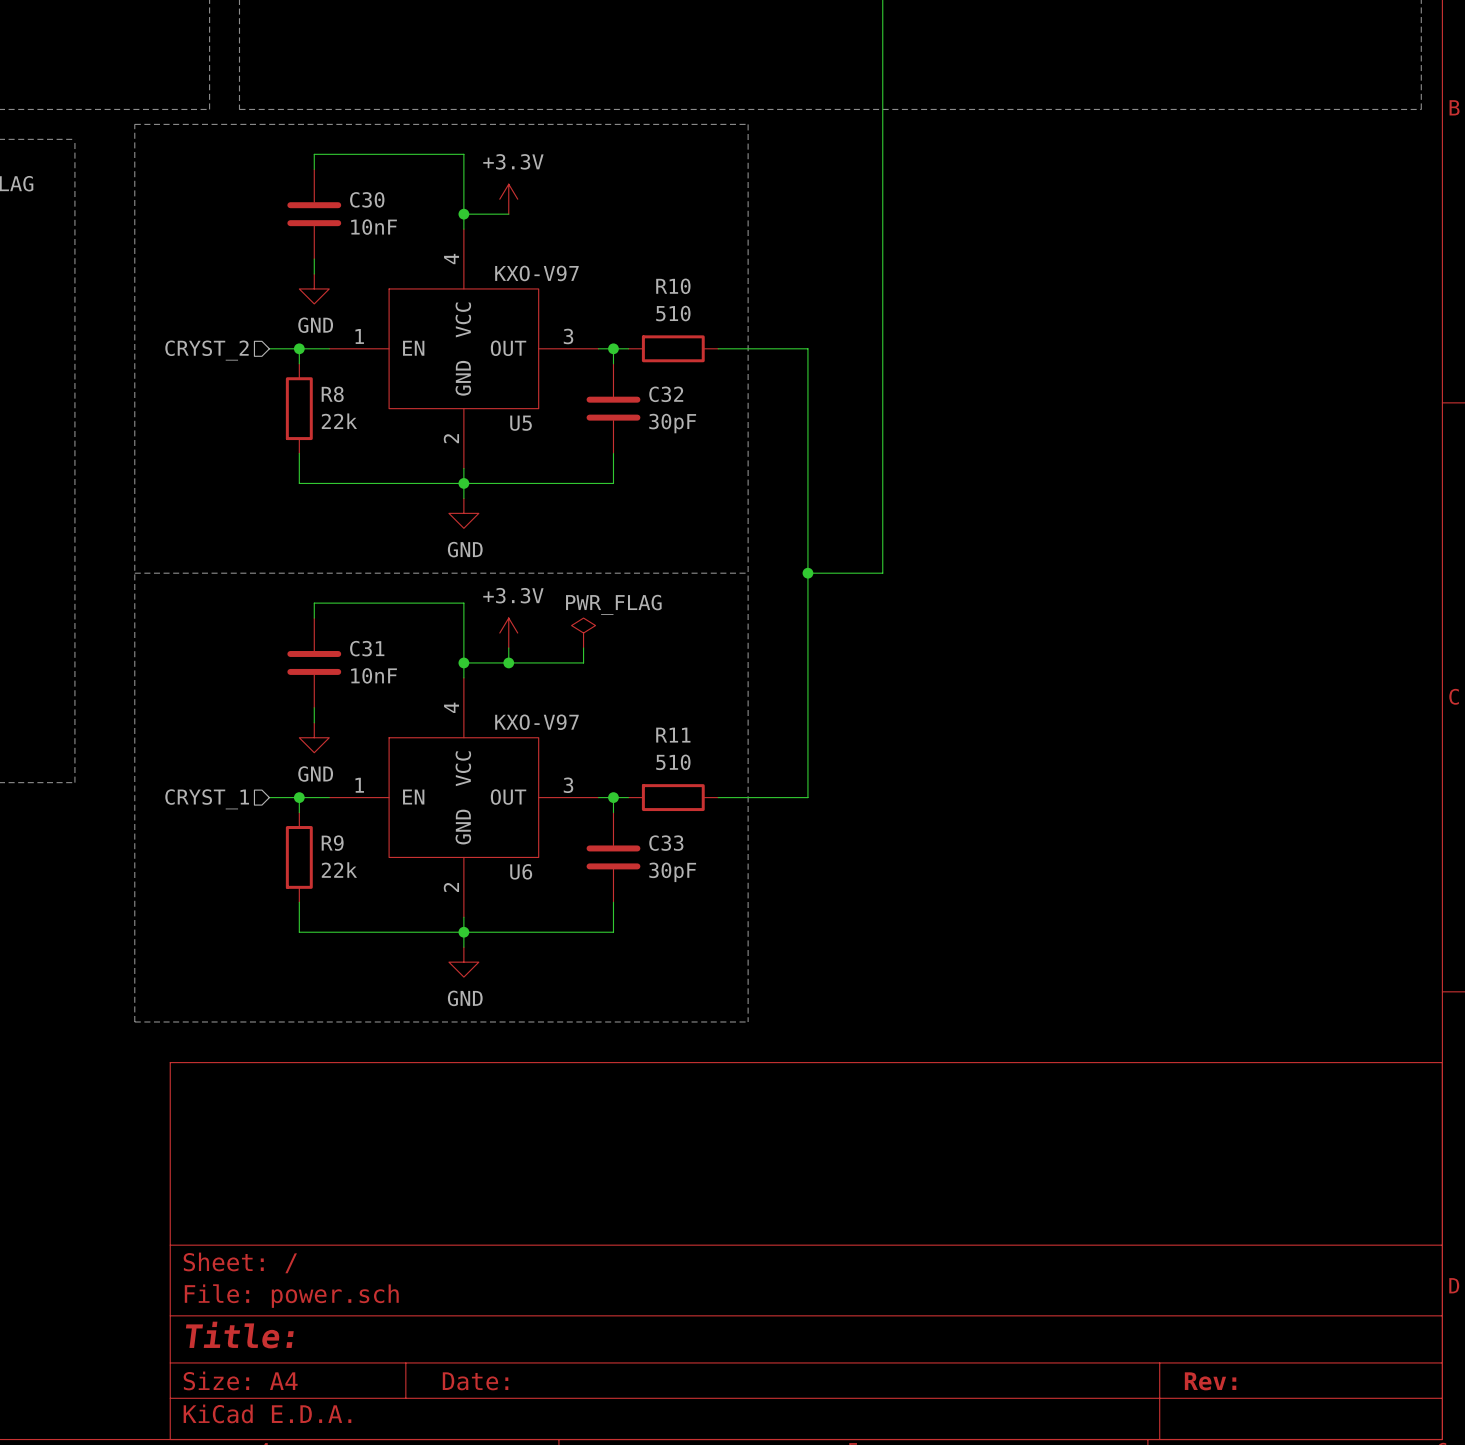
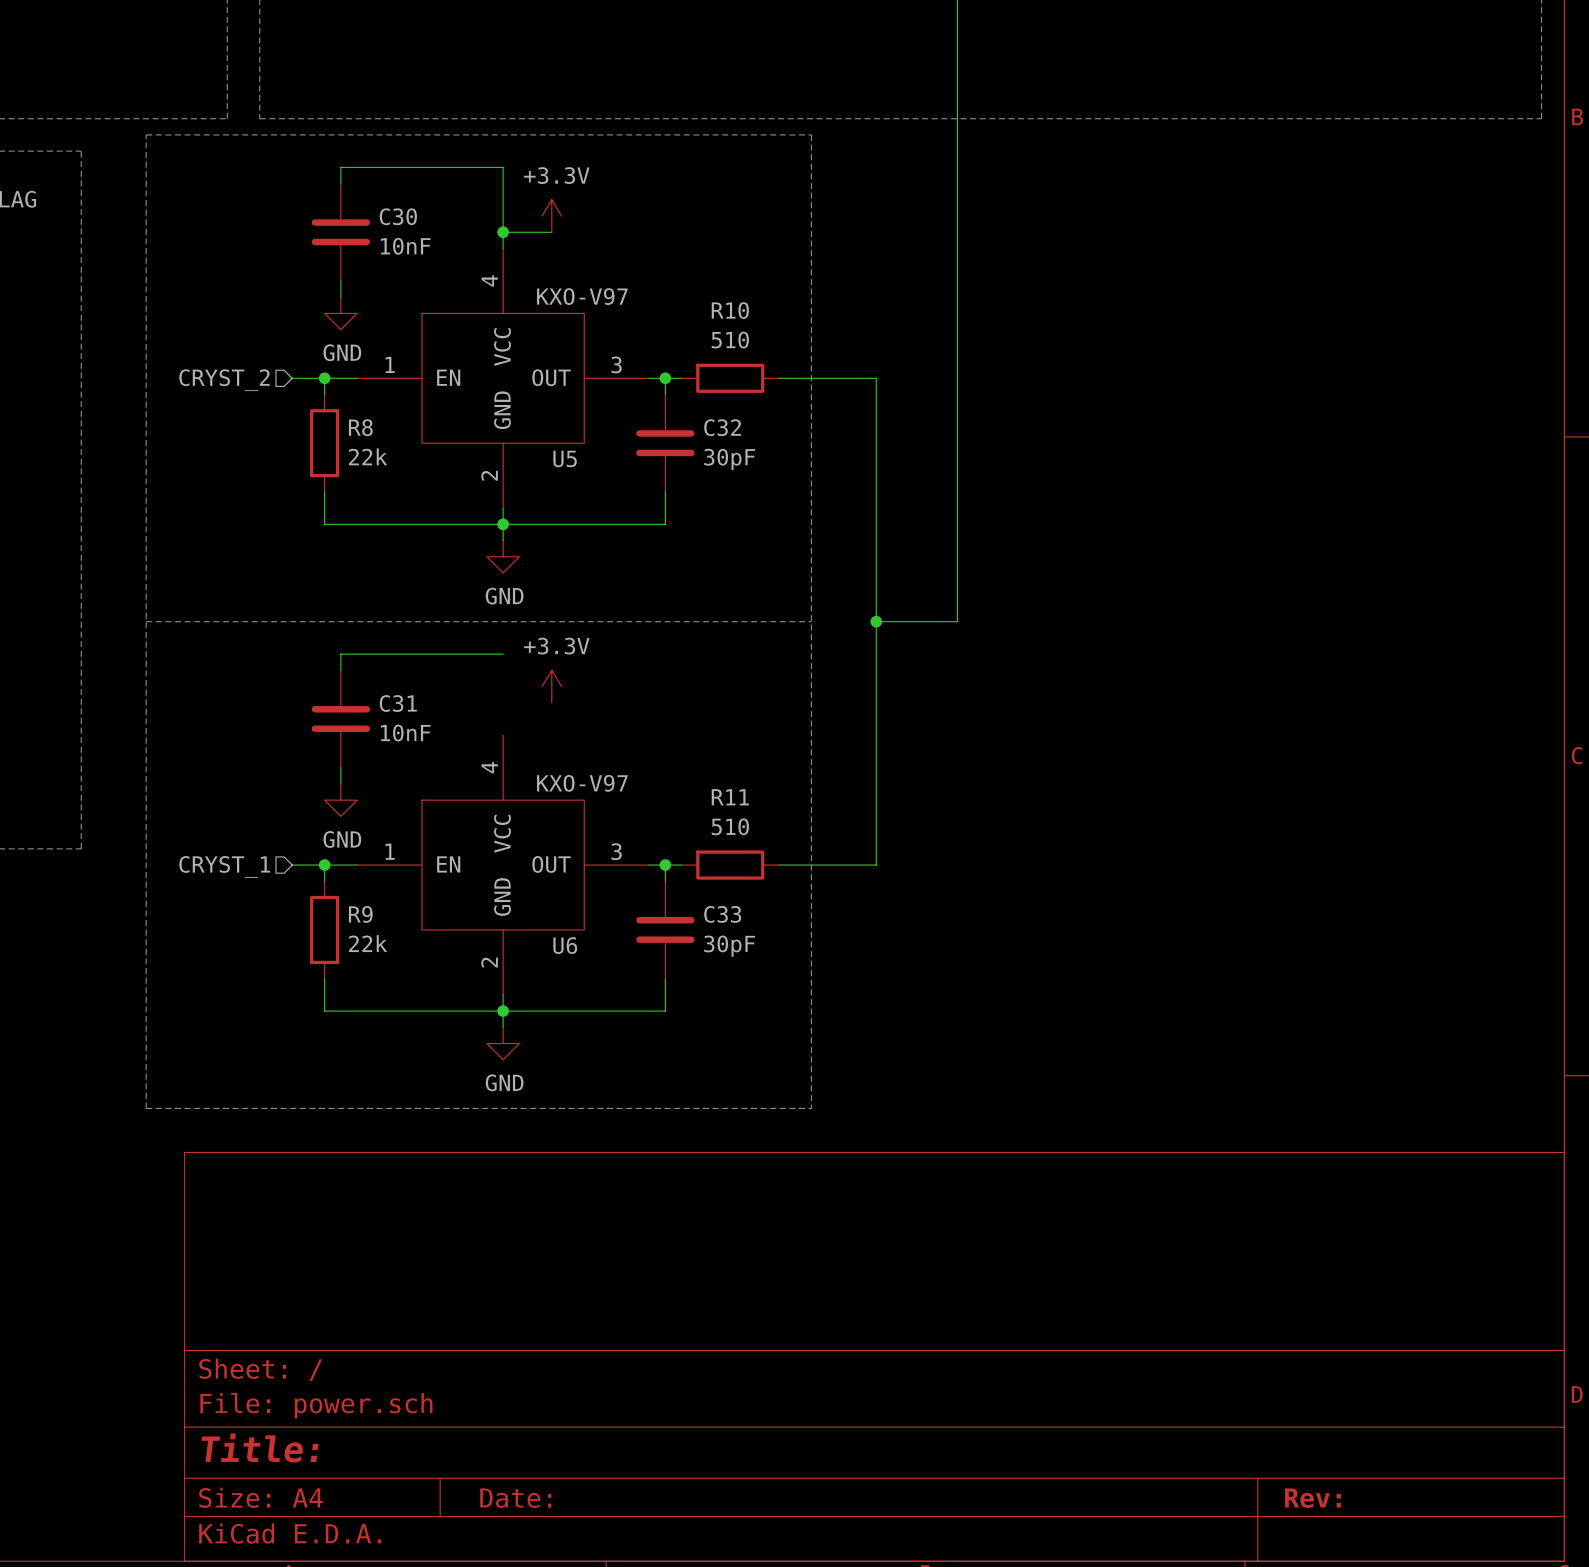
wire: (463, 603) (463, 677) -> none
power symbol: PWR_FLAG (583, 633) -> none
wire: (508, 648) (508, 662) -> none
wire: (583, 648) (583, 662) (463, 662) -> none
junction: (463, 662) -> none
junction: (508, 662) -> none

